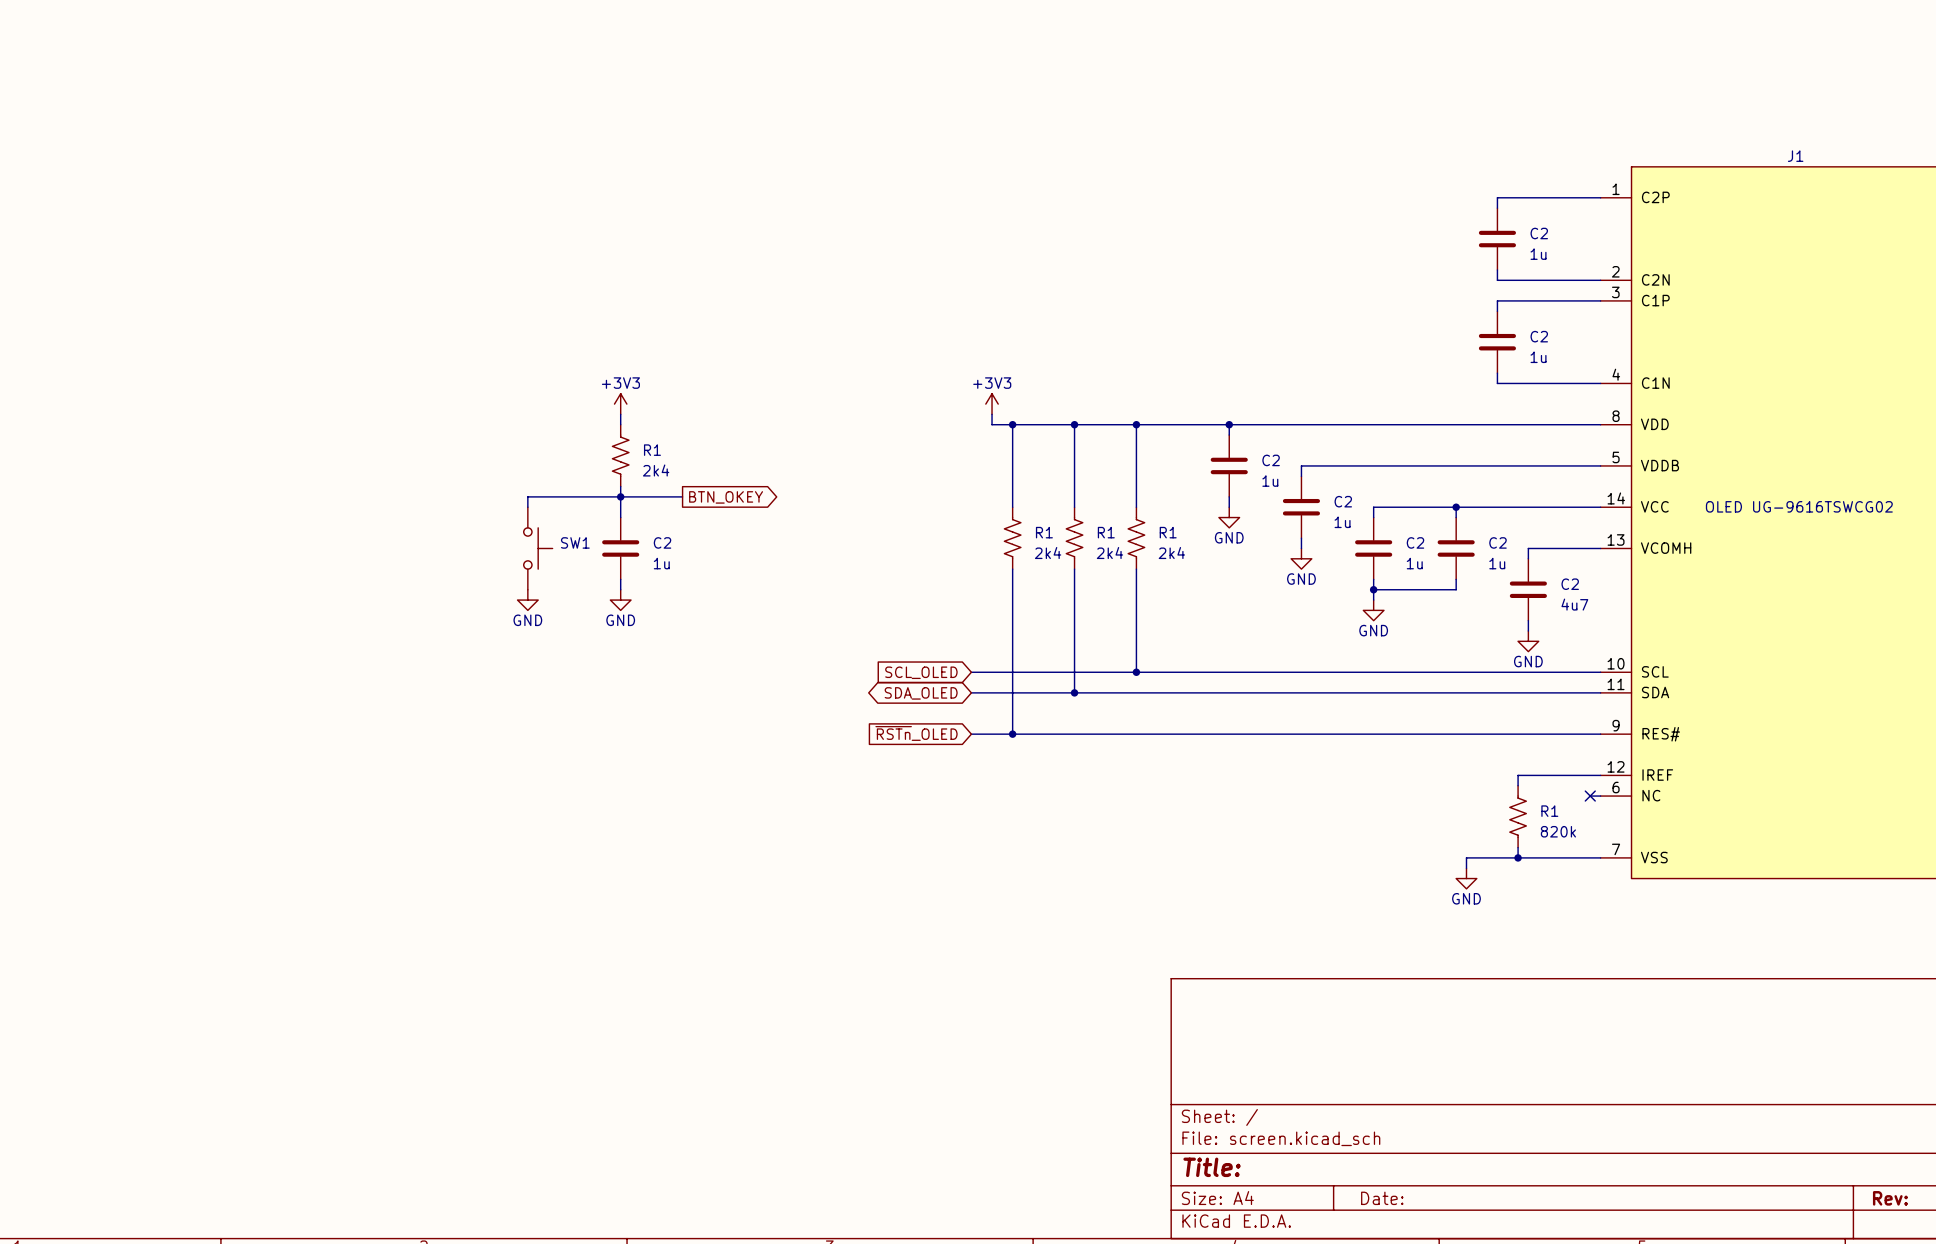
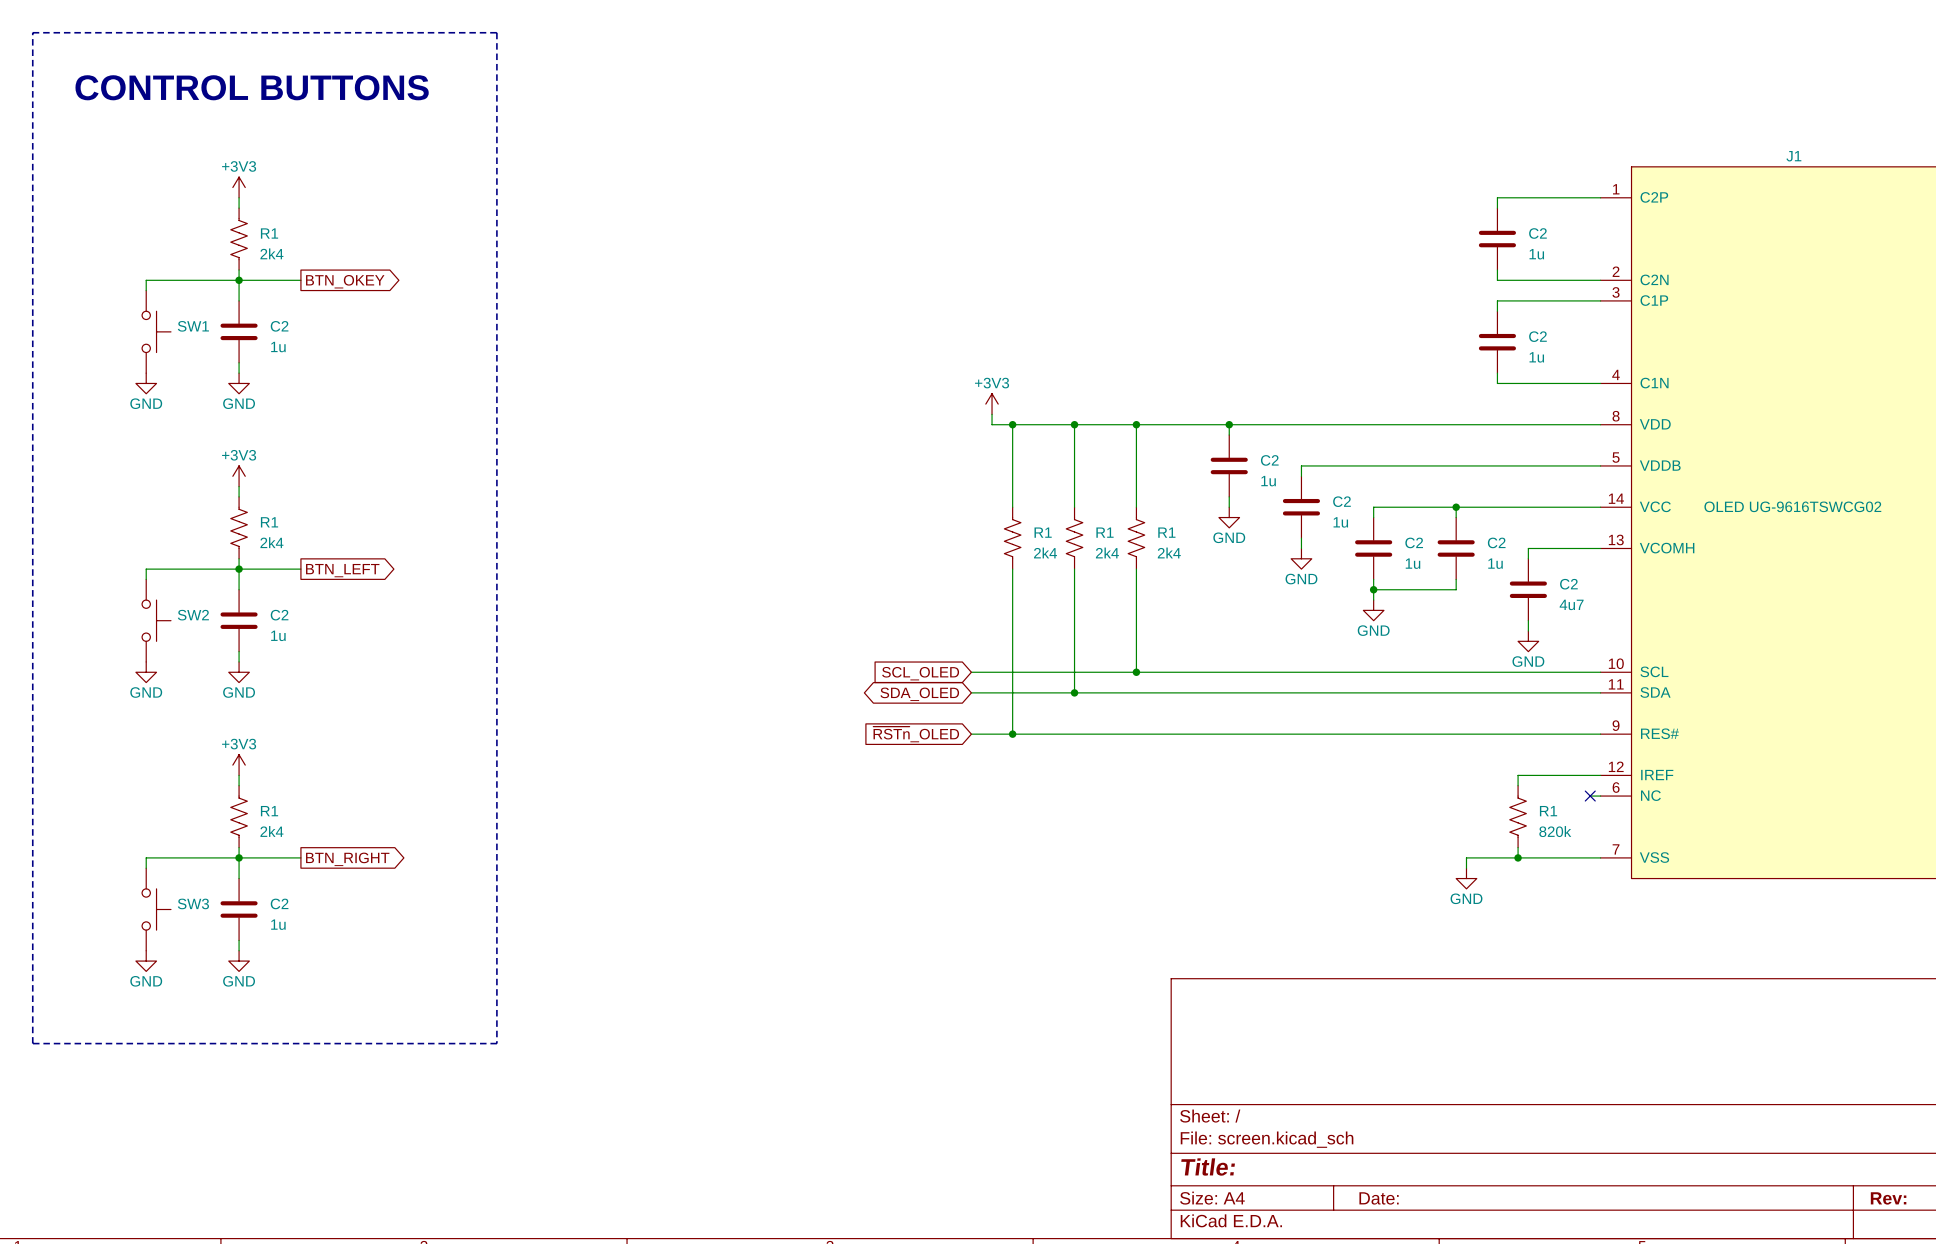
line: none -> (32, 32) (496, 32) (496, 1043) (32, 1043) (32, 32)
text: none -> CONTROL BUTTONS (252, 87)
power symbol: none -> +3V3 (239, 187)
wire: none -> (239, 197) (239, 208)
R1: none -> 2k4 (239, 239)
wire: none -> (239, 269) (239, 300)
junction: none -> (239, 280)
wire: none -> (300, 280) (146, 280) (146, 290)
global label: none -> BTN_OKEY (345, 281)
C2: none -> 1u (239, 331)
wire: none -> (239, 362) (239, 373)
power symbol: none -> GND (146, 383)
power symbol: none -> GND (239, 383)
power symbol: +3V3 (620, 404) -> none
wire: (620, 414) (620, 424) -> none
R1: 2k4 (620, 455) -> none
power symbol: none -> +3V3 (239, 476)
wire: none -> (239, 486) (239, 496)
wire: (620, 486) (620, 517) -> none
junction: (620, 496) -> none
wire: (682, 496) (527, 496) (527, 507) -> none
global label: BTN_OKEY (726, 497) -> none
R1: none -> 2k4 (239, 527)
SW1 position: (538, 548) -> (156, 331)
C2: 1u (620, 548) -> none
wire: none -> (239, 558) (239, 589)
junction: none -> (239, 569)
wire: none -> (300, 569) (146, 569) (146, 579)
global label: none -> BTN_LEFT (342, 570)
wire: (620, 579) (620, 589) -> none
power symbol: GND (527, 600) -> none
power symbol: GND (620, 600) -> none
SW2: none -> (156, 620)
C2: none -> 1u (239, 620)
wire: none -> (239, 651) (239, 661)
power symbol: none -> GND (146, 672)
power symbol: none -> GND (239, 672)
power symbol: none -> +3V3 (239, 765)
wire: none -> (239, 775) (239, 785)
R1: none -> 2k4 (239, 816)
wire: none -> (239, 847) (239, 878)
junction: none -> (239, 857)
wire: none -> (300, 857) (146, 857) (146, 868)
global label: none -> BTN_RIGHT (347, 859)
SW3: none -> (156, 909)
C2: none -> 1u (239, 909)
wire: none -> (239, 940) (239, 950)
power symbol: none -> GND (146, 961)
power symbol: none -> GND (239, 961)

